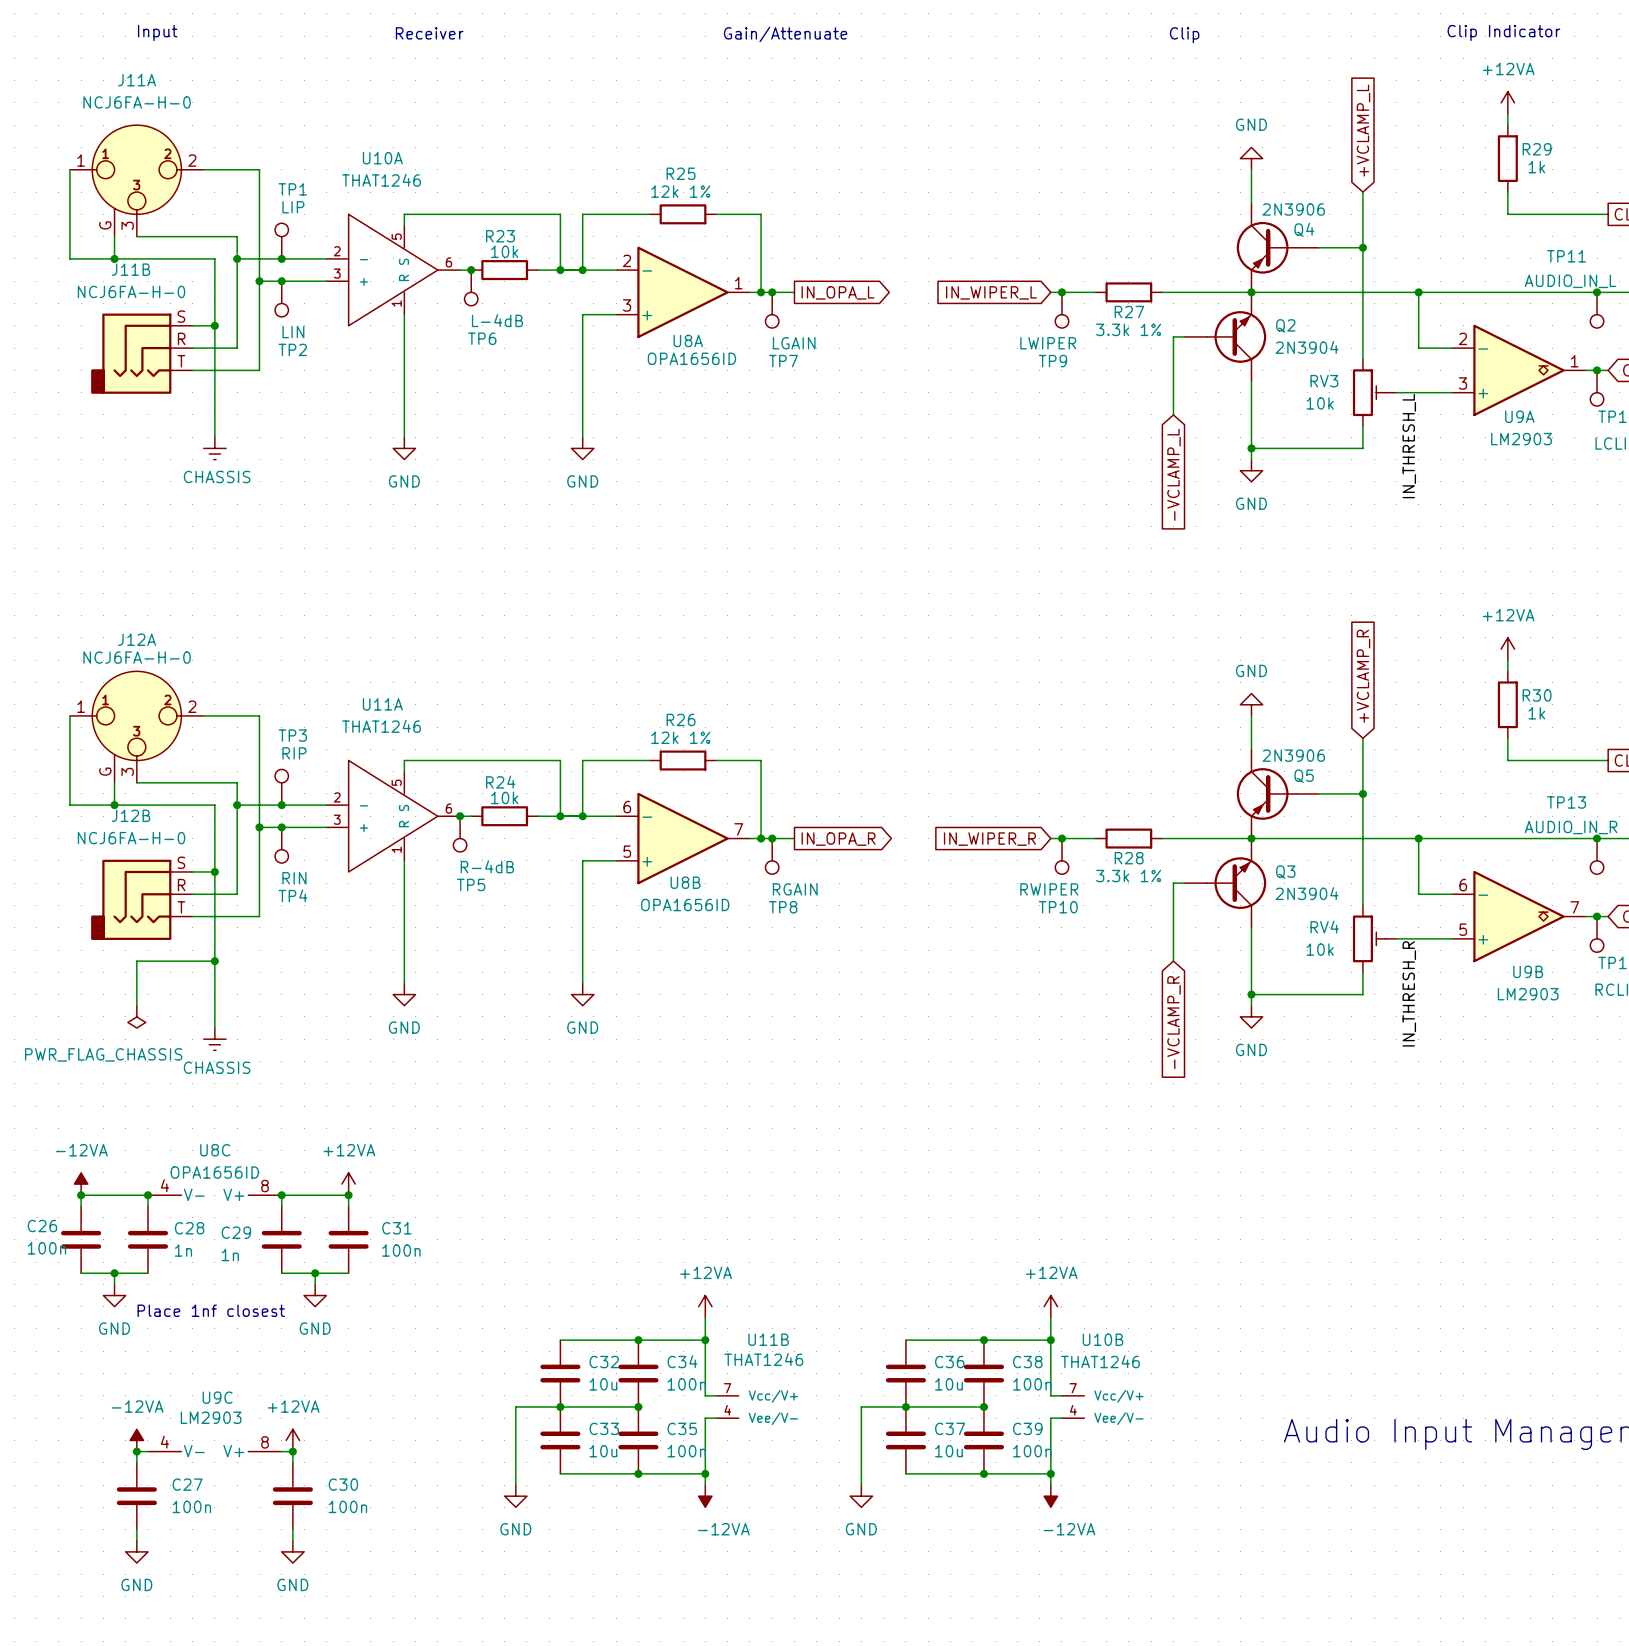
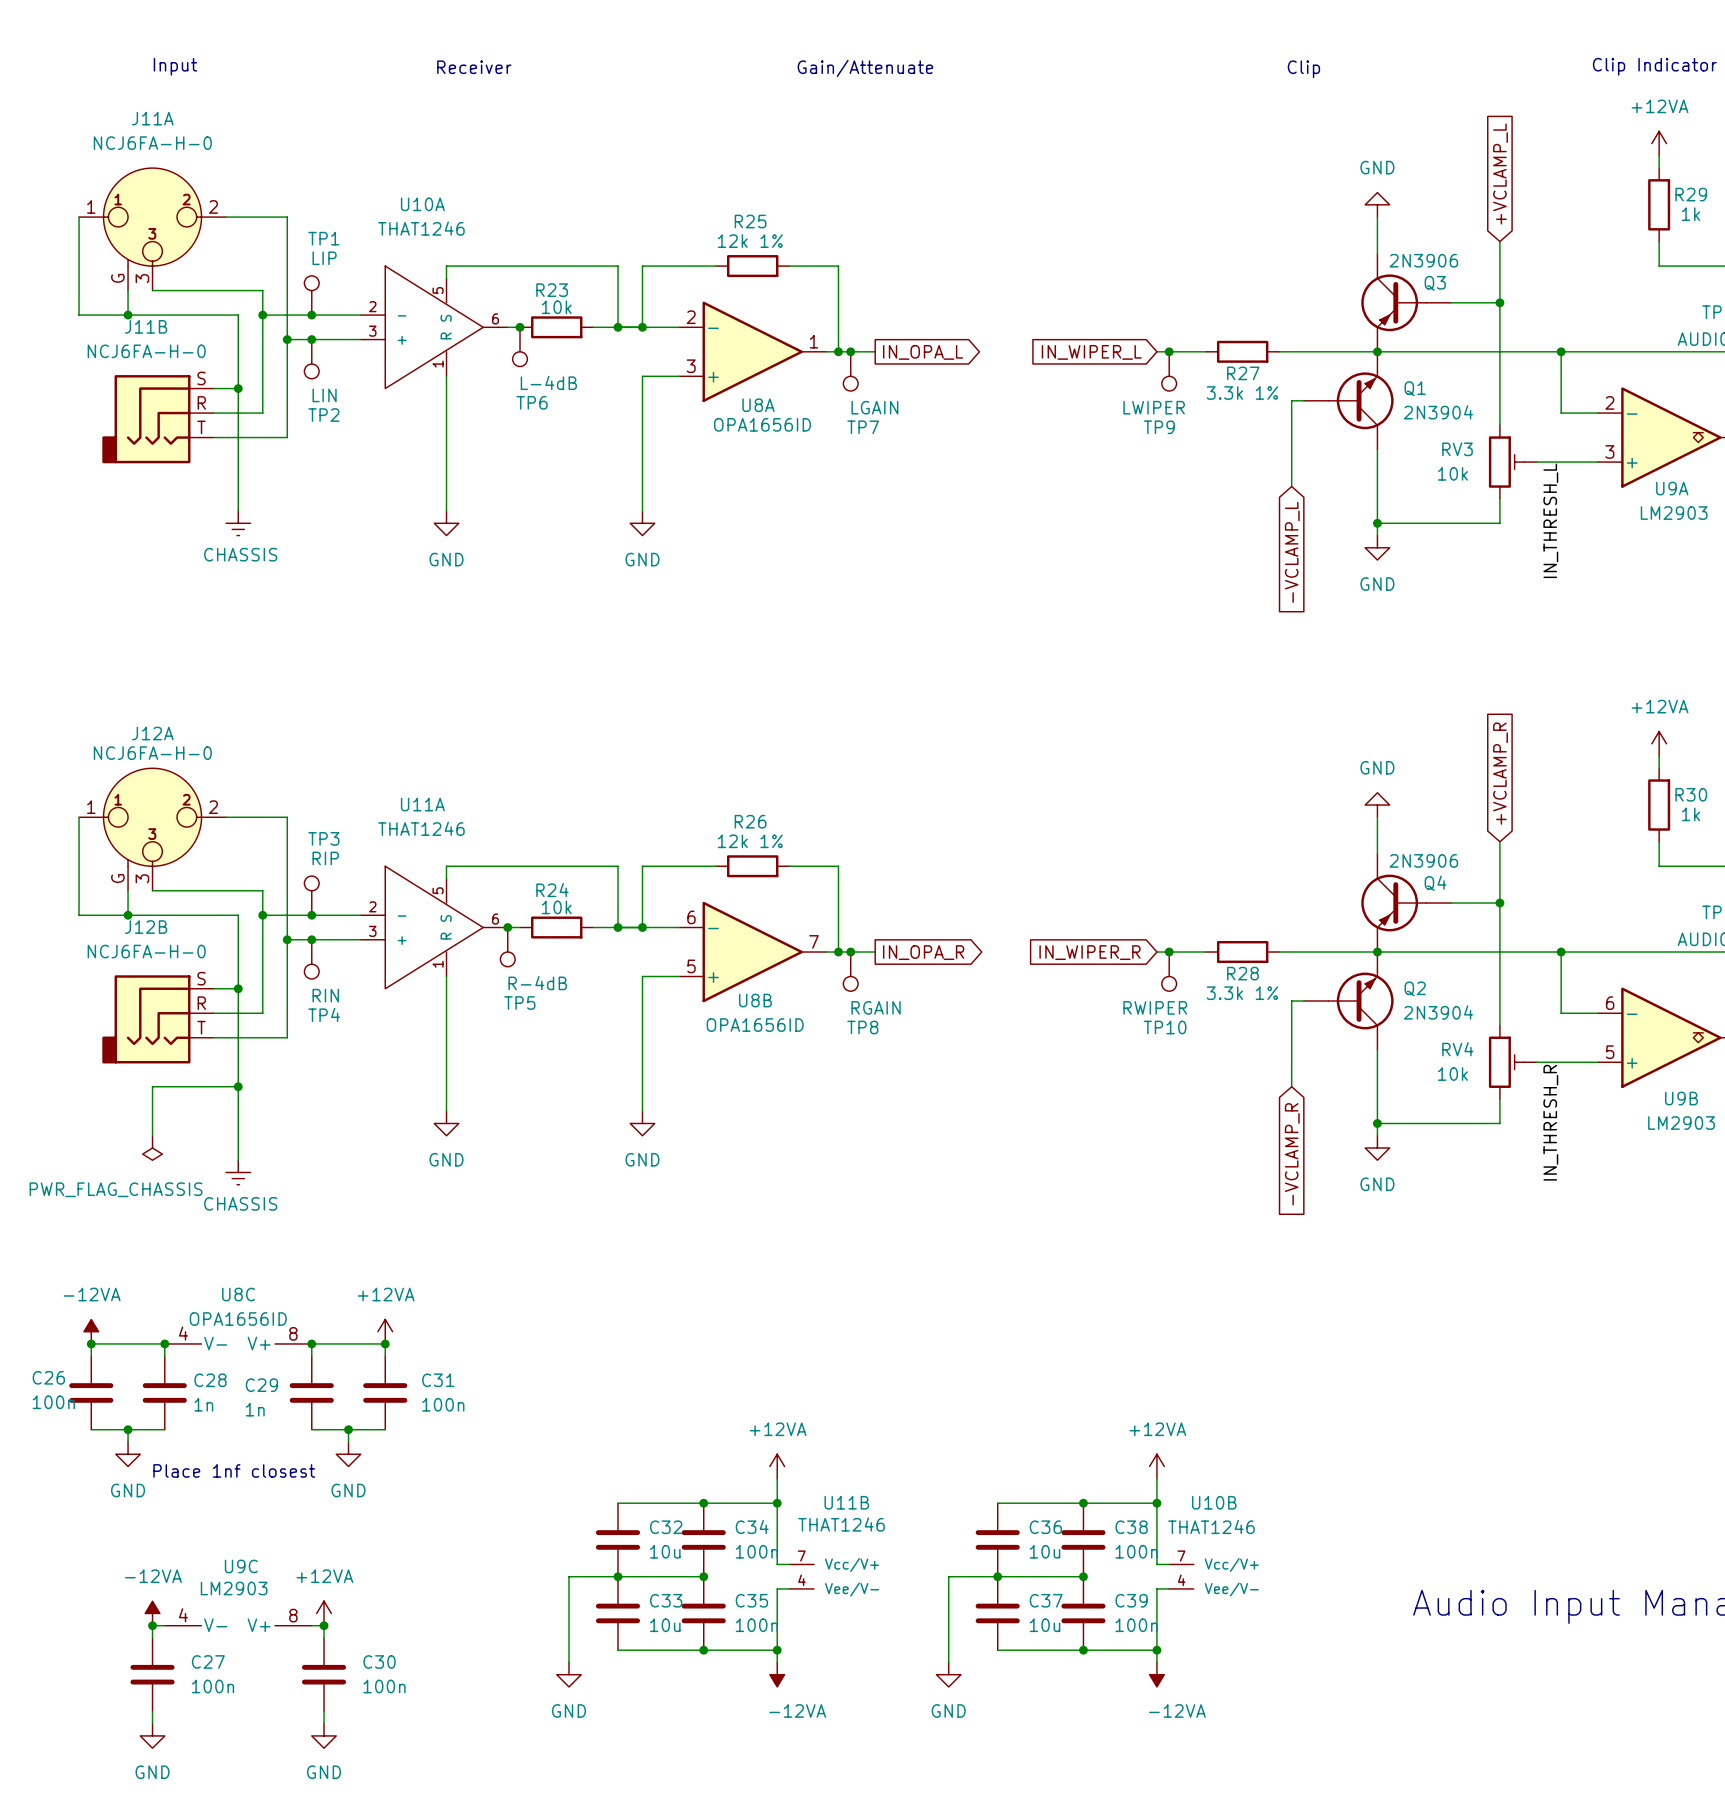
Q4 name: Q4 (1304, 229) -> Q3 (1435, 283)
Q2 name: Q2 (1285, 325) -> Q1 (1415, 388)
Q5 name: Q5 (1304, 776) -> Q4 (1435, 883)
Q3 name: Q3 (1285, 872) -> Q2 (1415, 988)

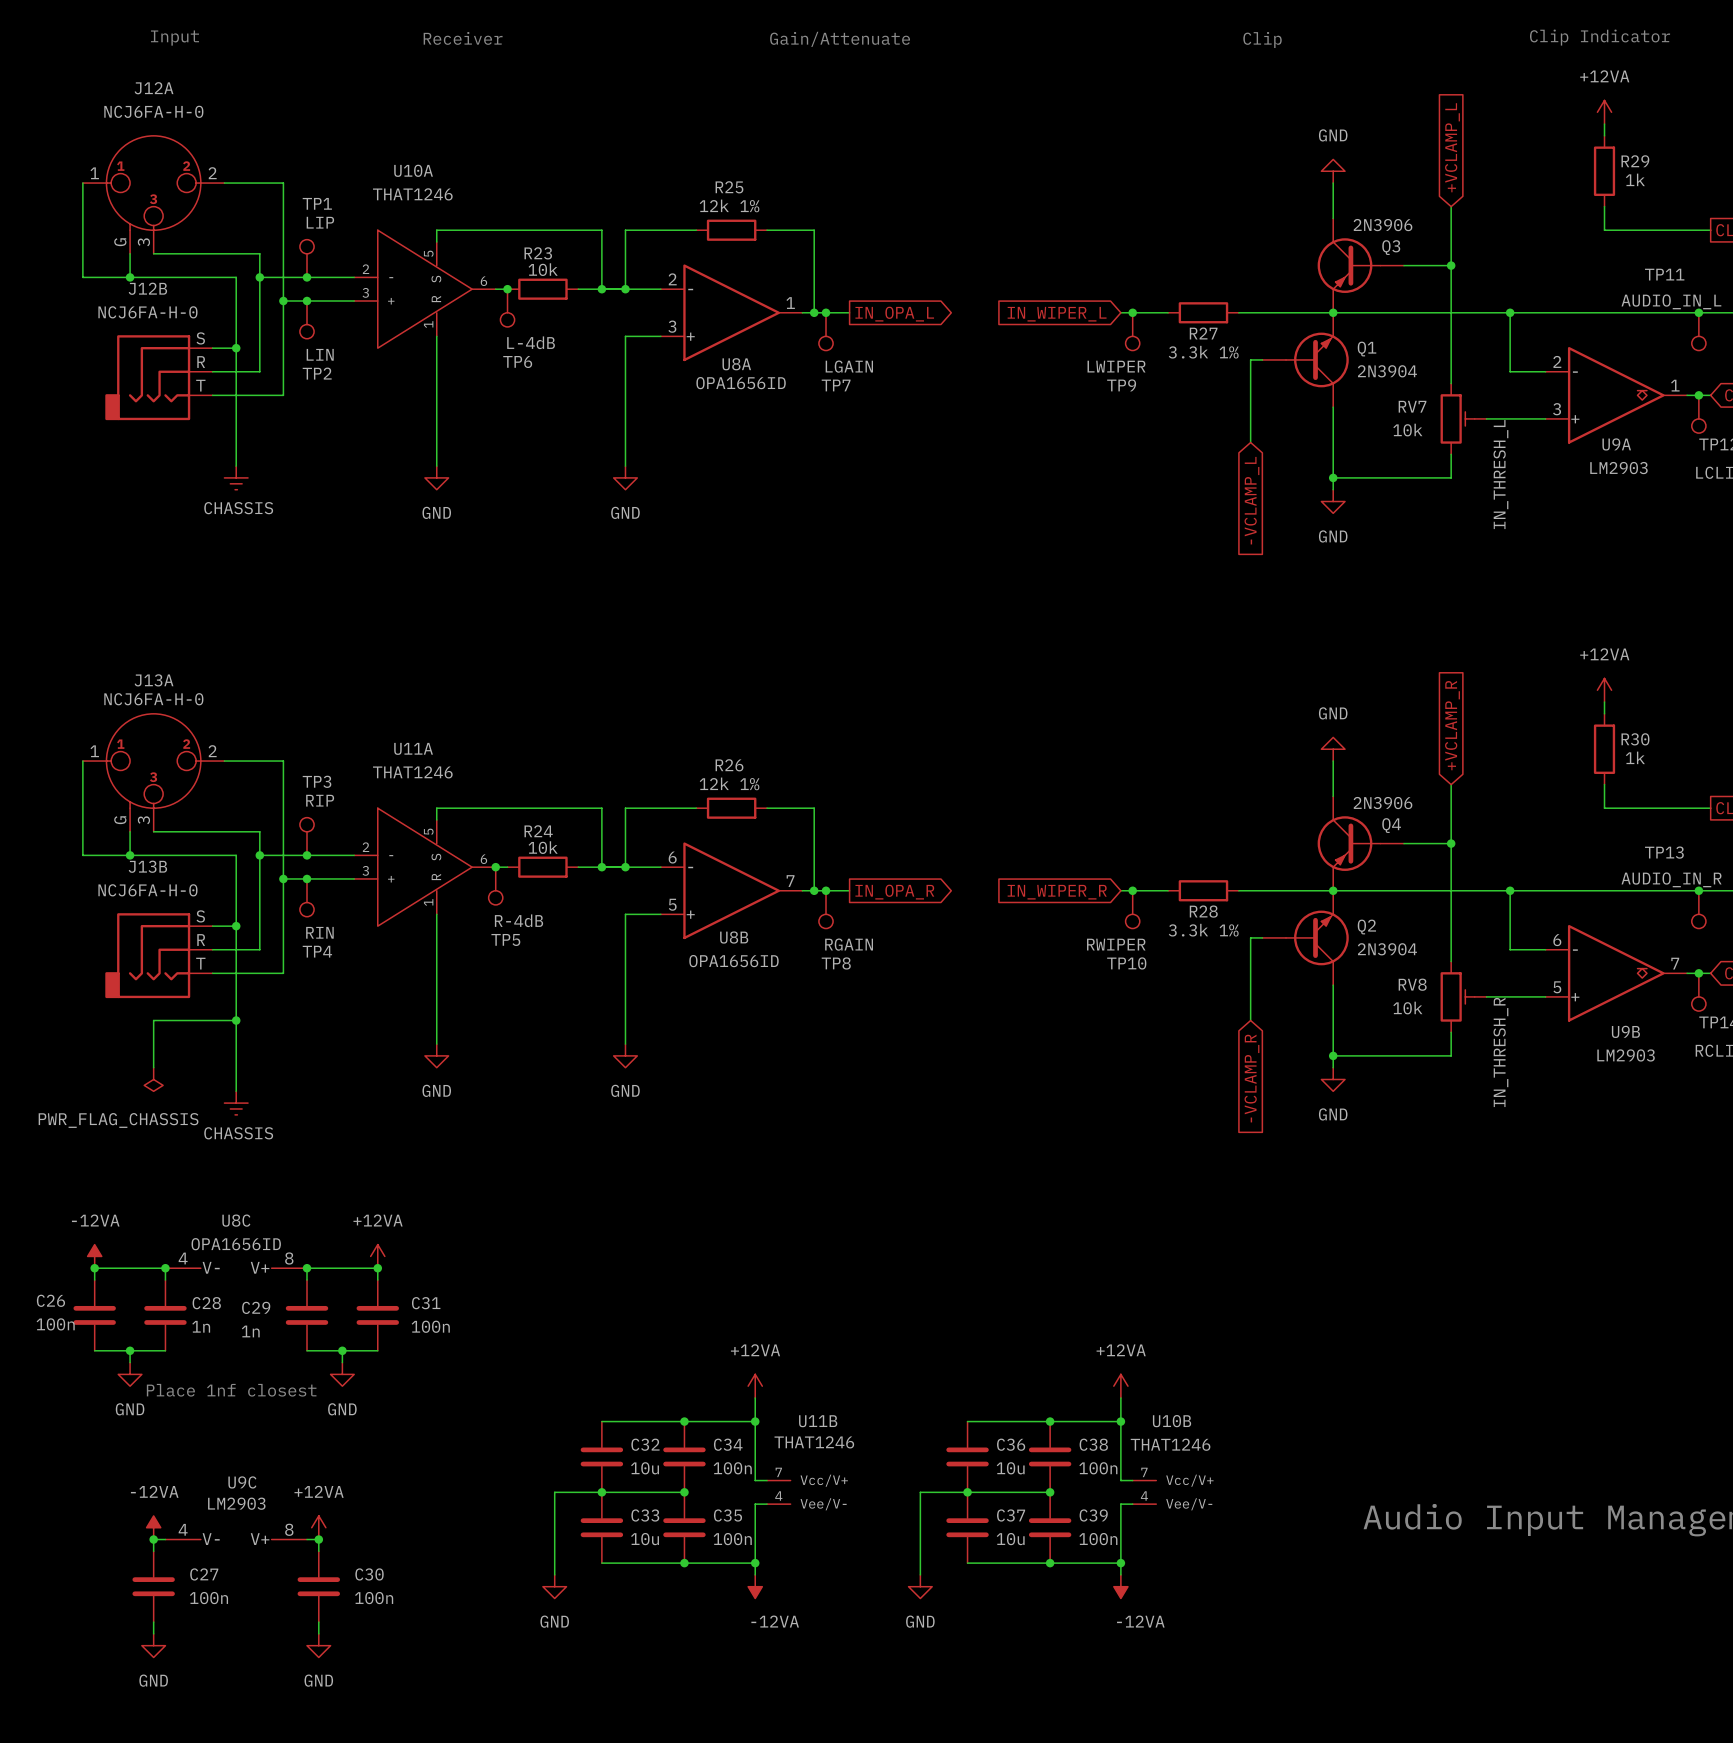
J11A name: J11A (152, 118) -> J12A (154, 88)
J11B name: J11B (146, 326) -> J12B (147, 288)
RV3 name: RV3 (1457, 449) -> RV7 (1412, 406)
J12A name: J12A (152, 733) -> J13A (154, 680)
J12B name: J12B (146, 927) -> J13B (147, 866)
RV4 name: RV4 (1457, 1049) -> RV8 (1412, 984)

